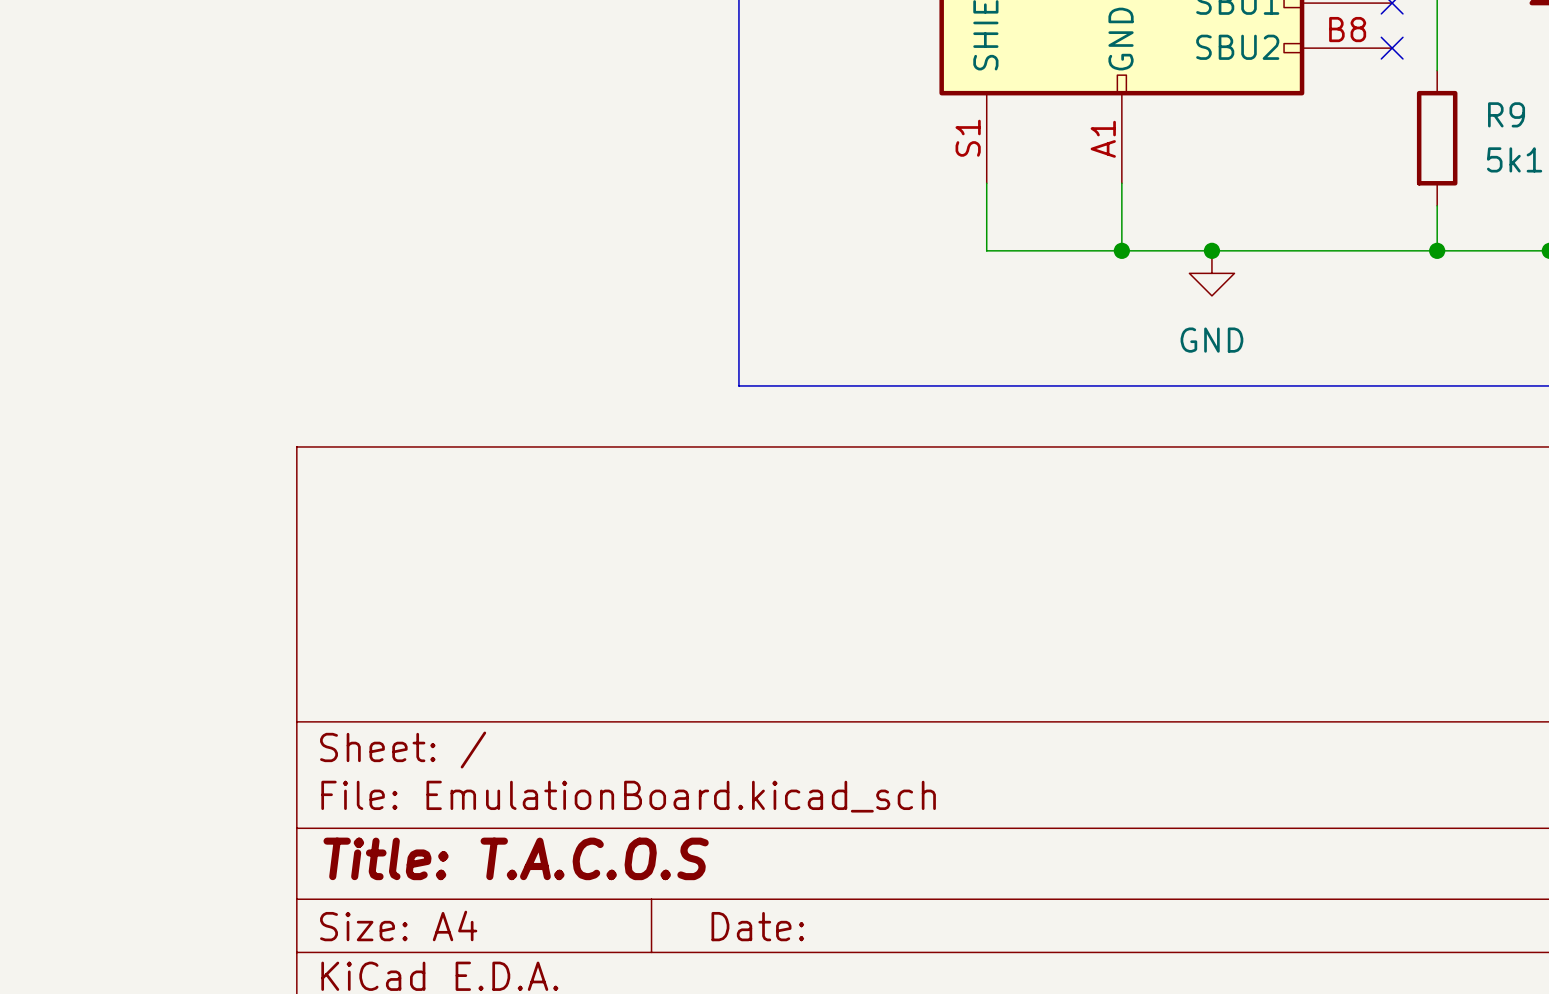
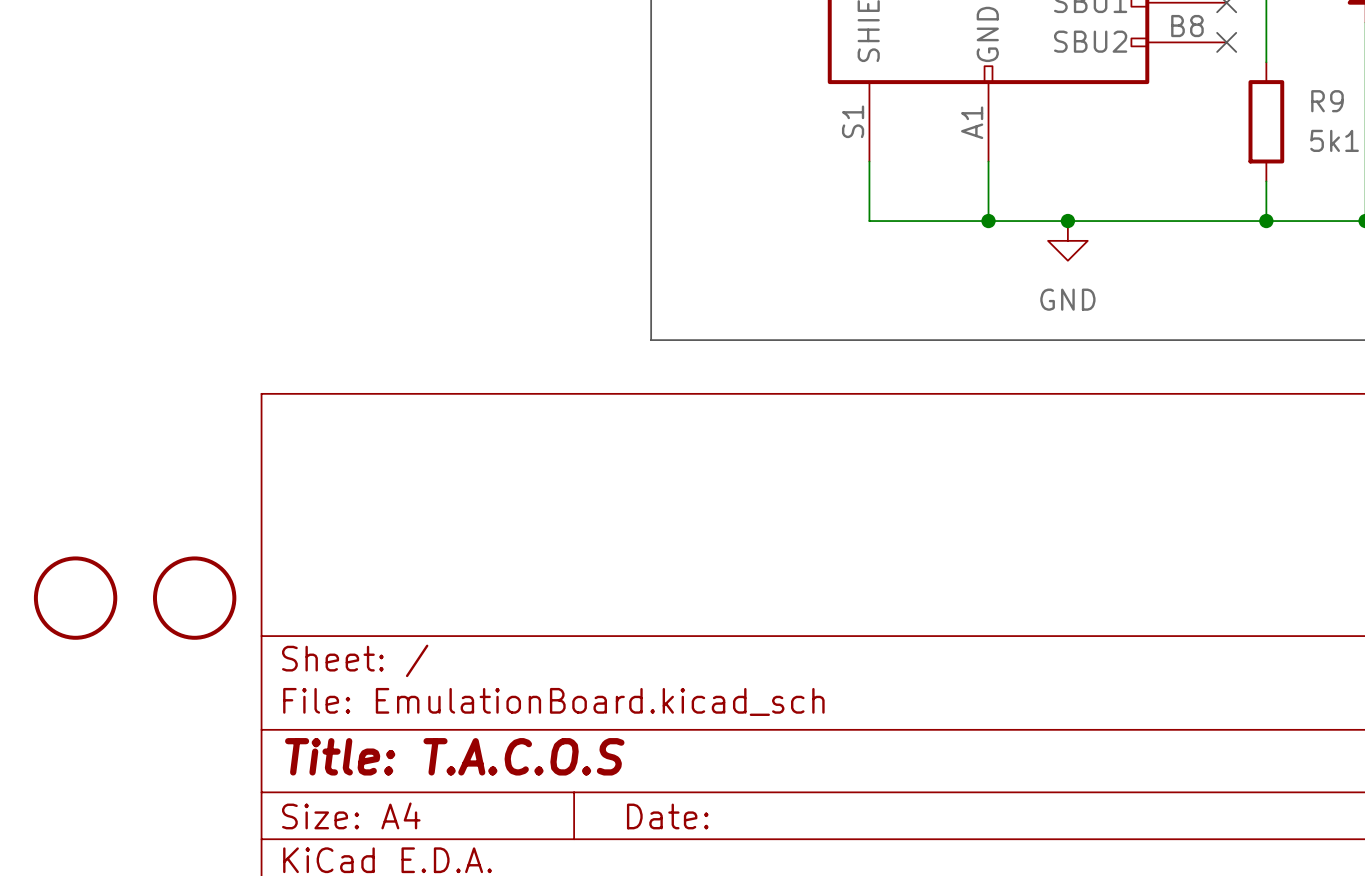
part: none -> (75, 598)
part: none -> (194, 598)

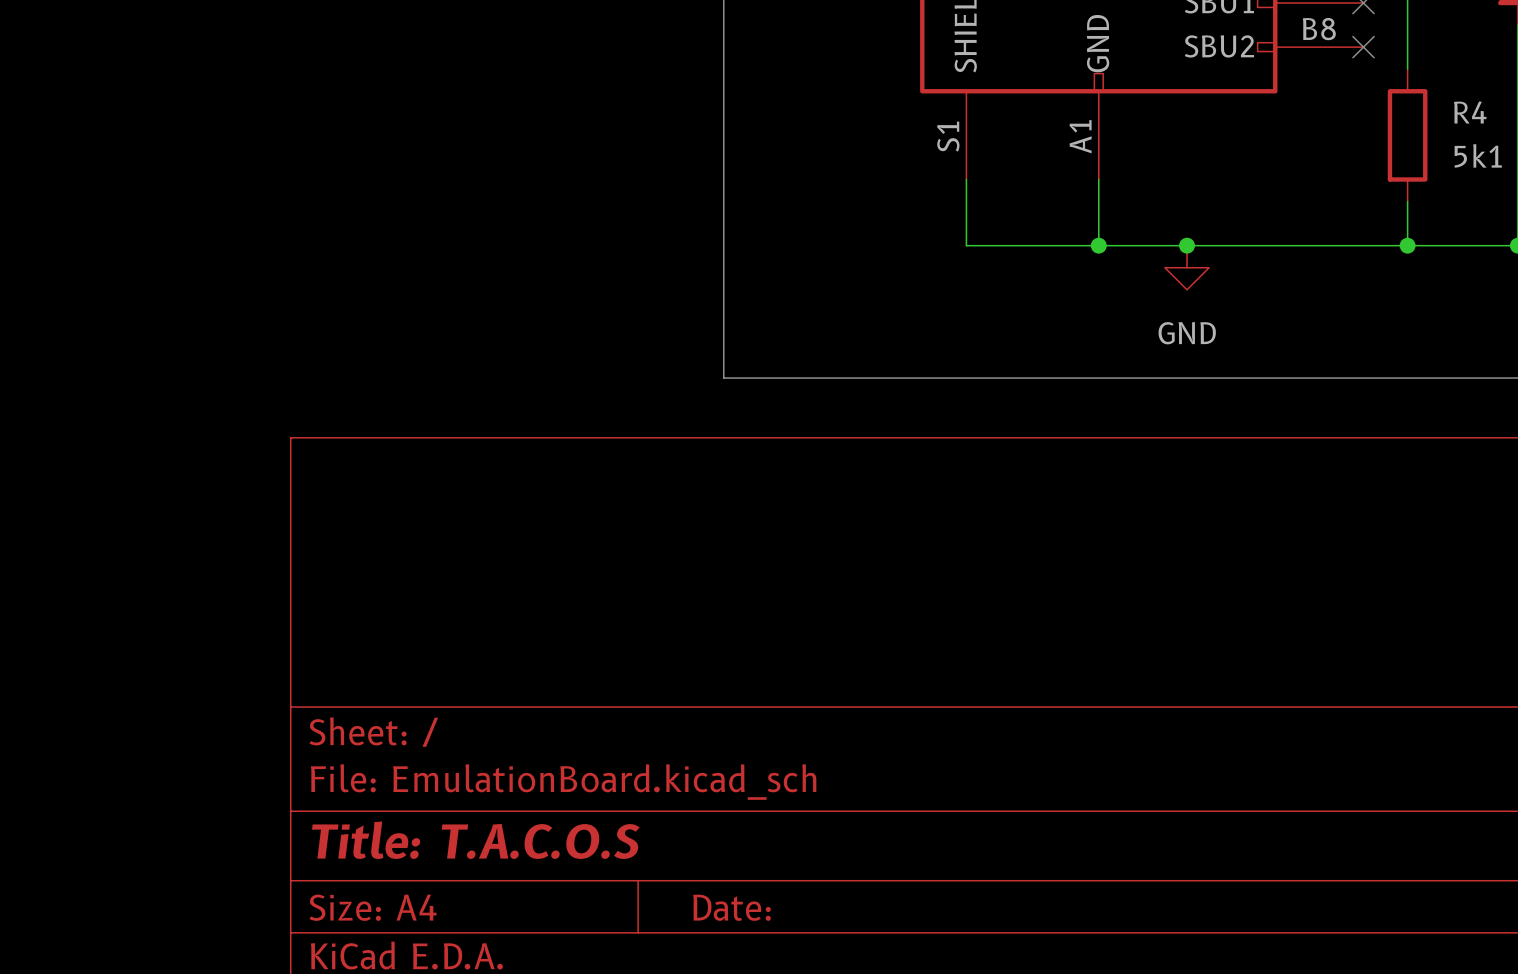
R9 name: R9 (1327, 101) -> R4 (1470, 112)
part: (75, 598) -> none
part: (194, 598) -> none

